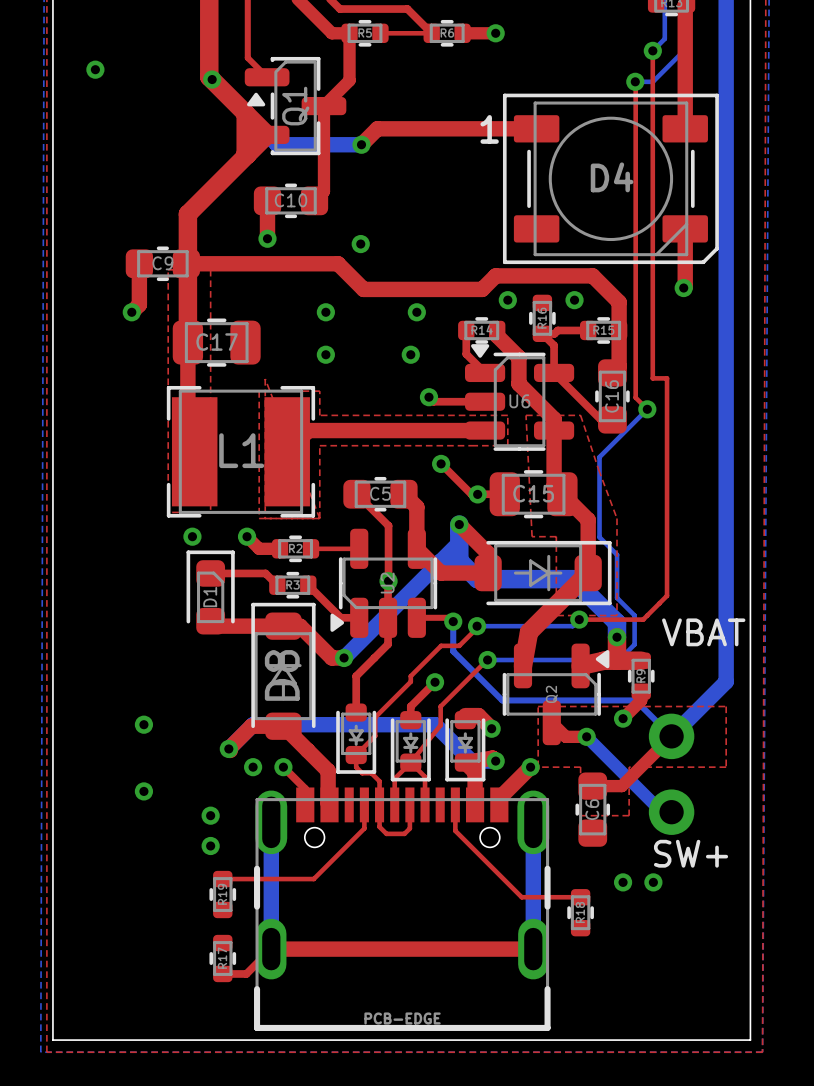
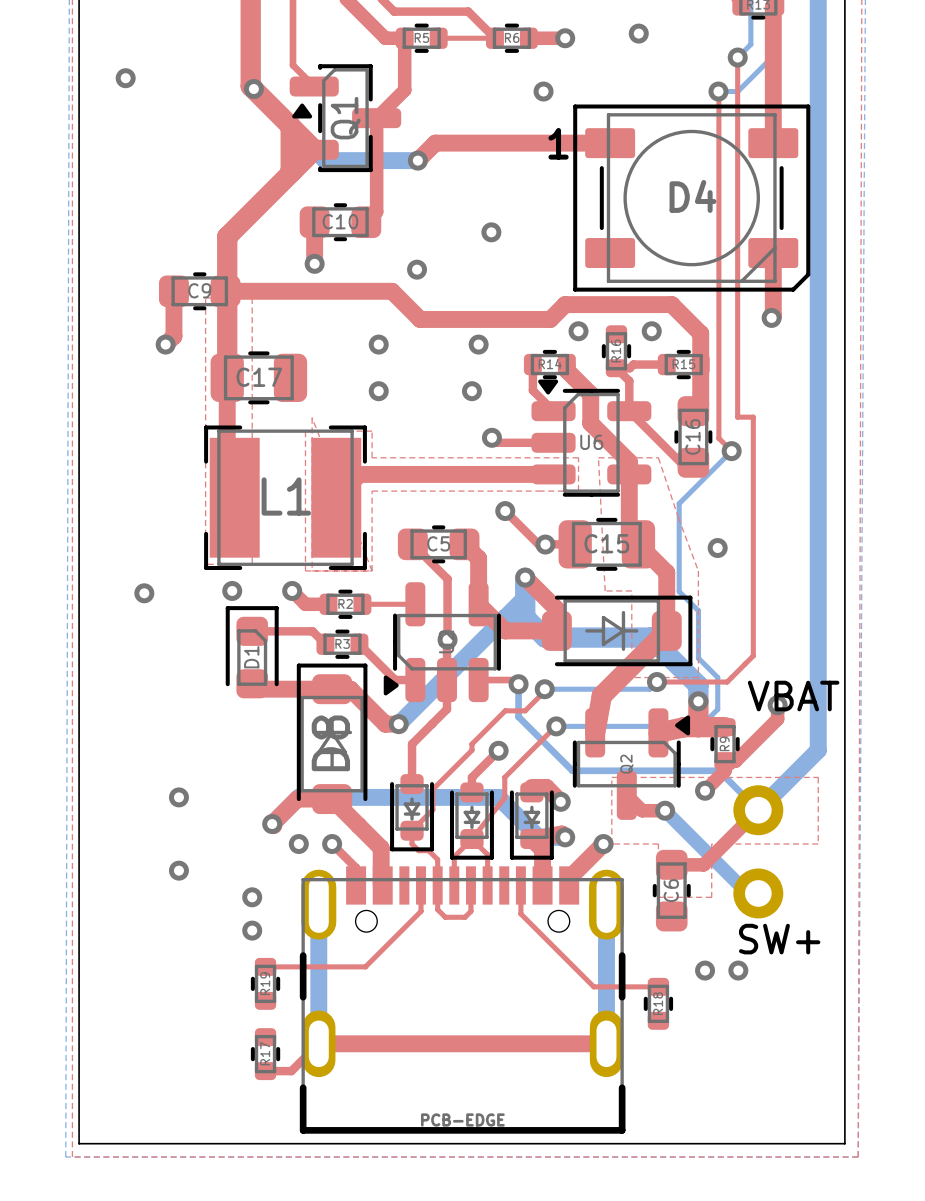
via: none -> (638, 33)
via: none -> (543, 91)
via: none -> (491, 232)
via: none -> (717, 548)
via: none -> (144, 593)
top track: none -> (777, 705) (777, 719) (735, 761) (725, 761)
via: none -> (777, 705)

